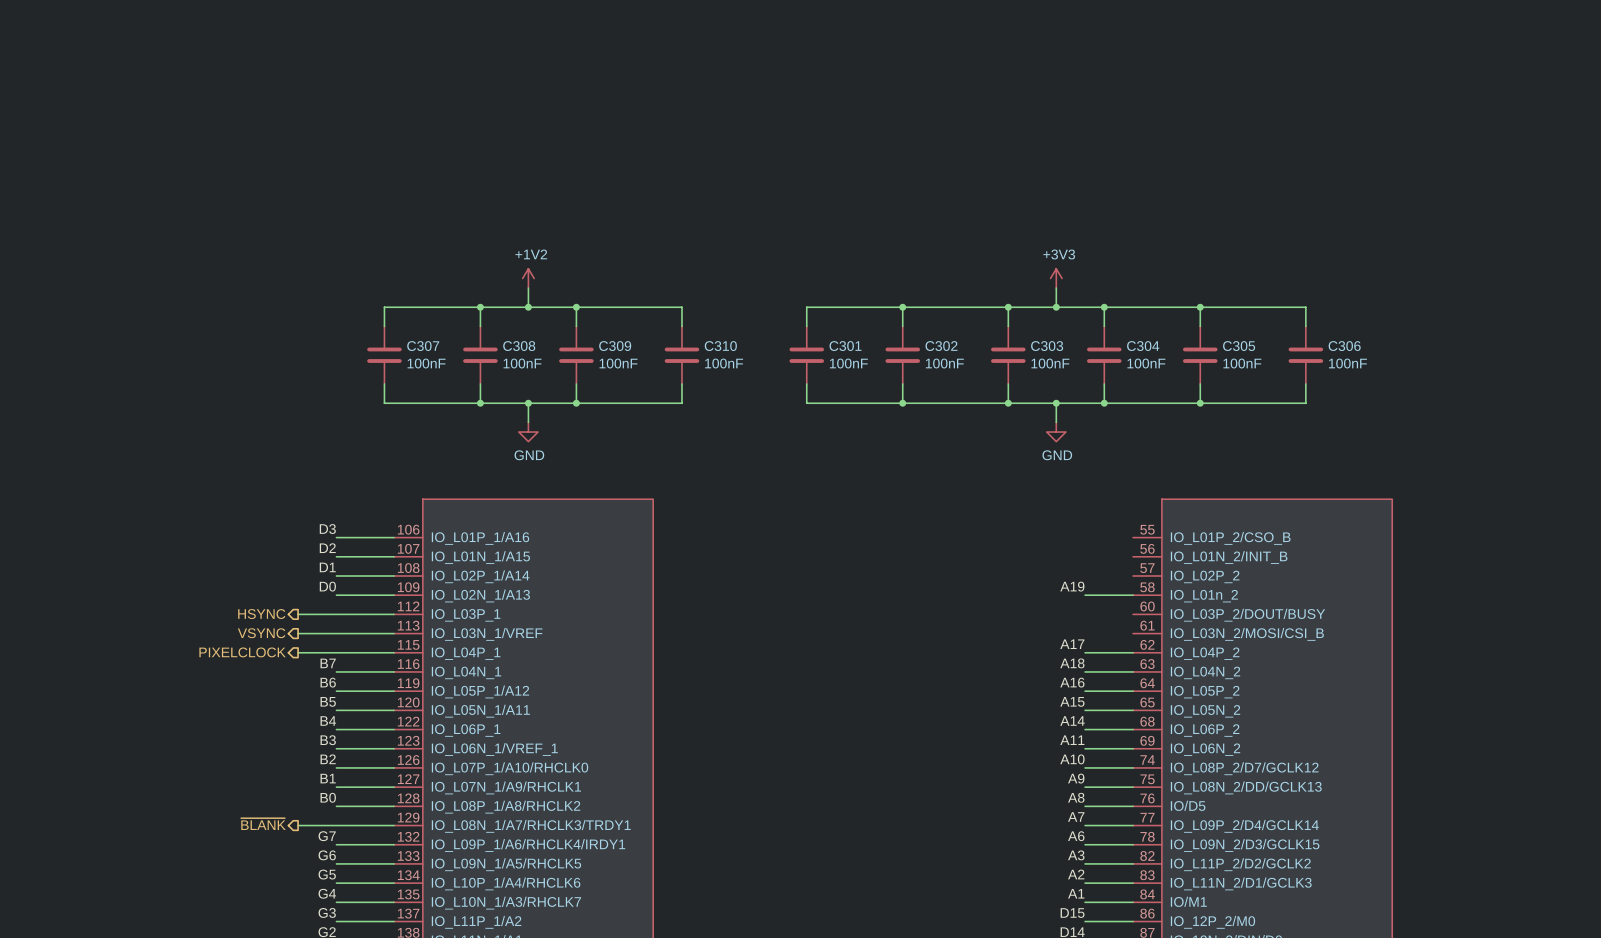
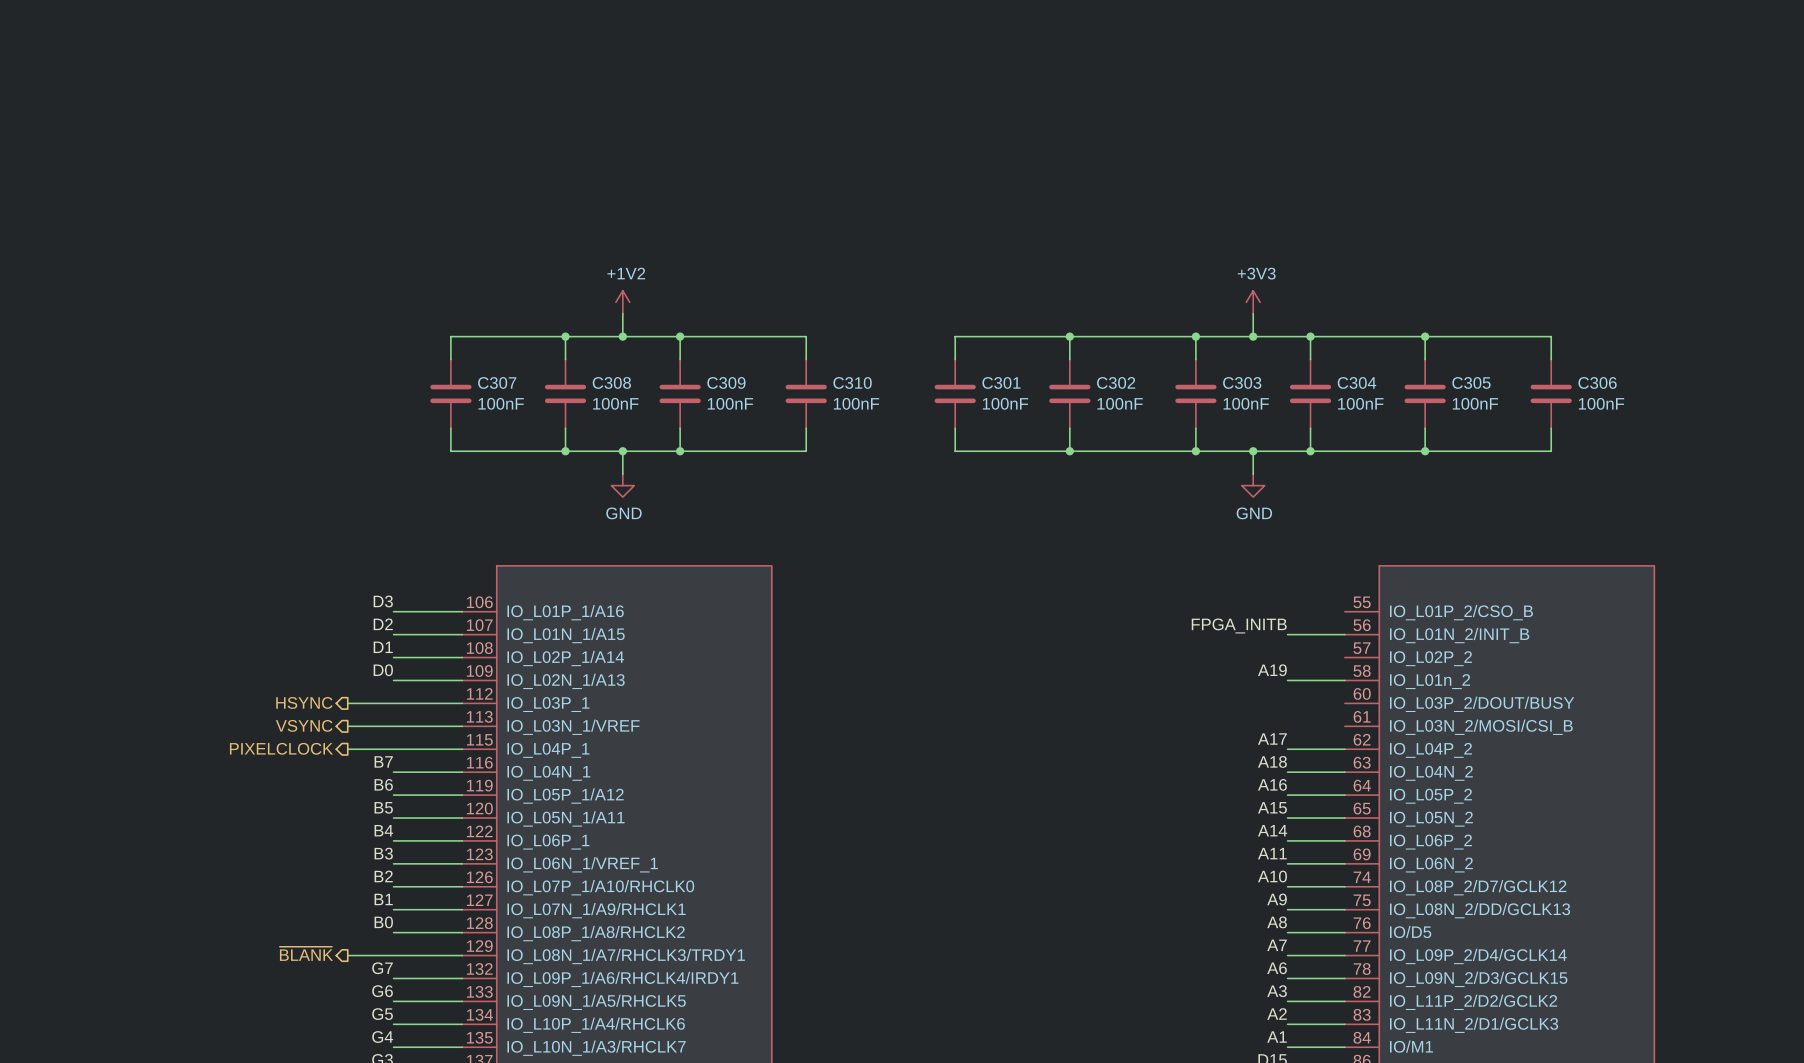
label: none -> FPGA_INITB (1239, 625)
wire: none -> (1287, 634) (1344, 634)

